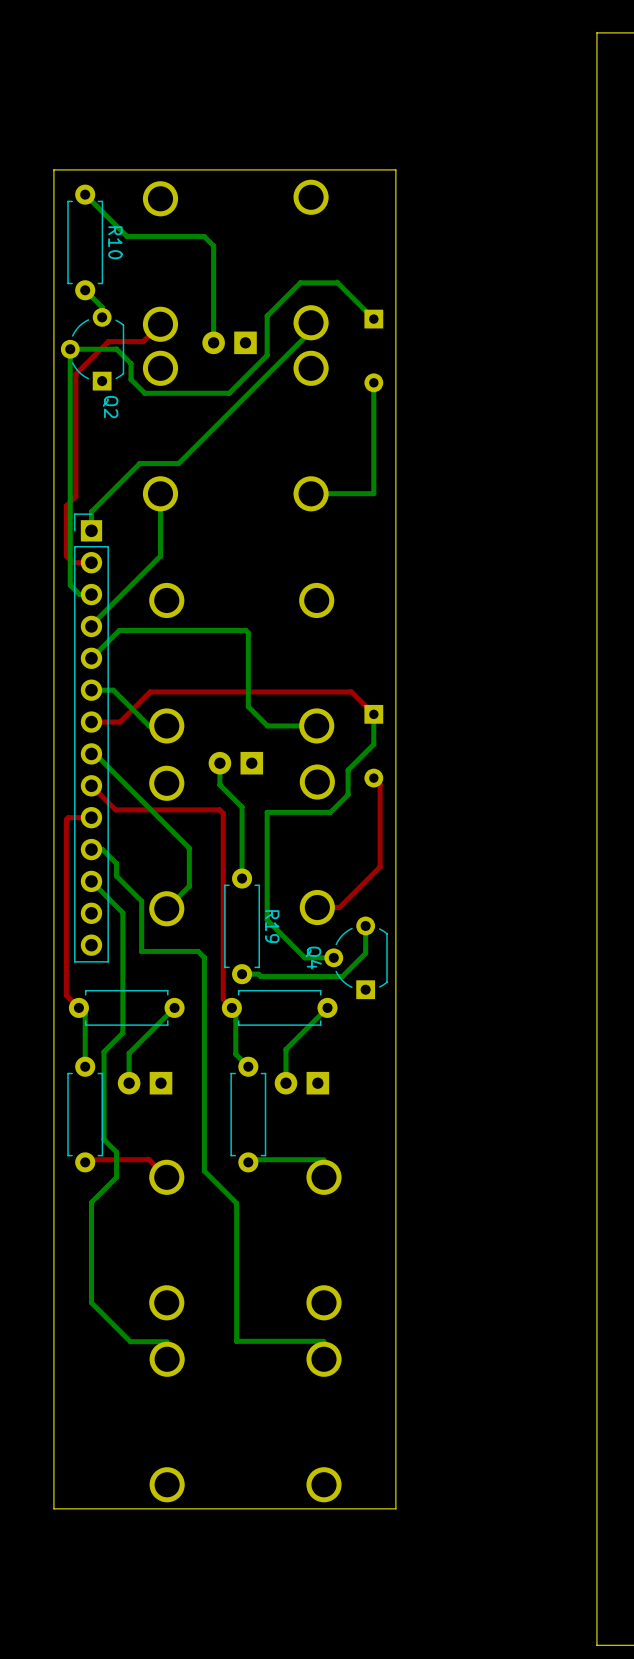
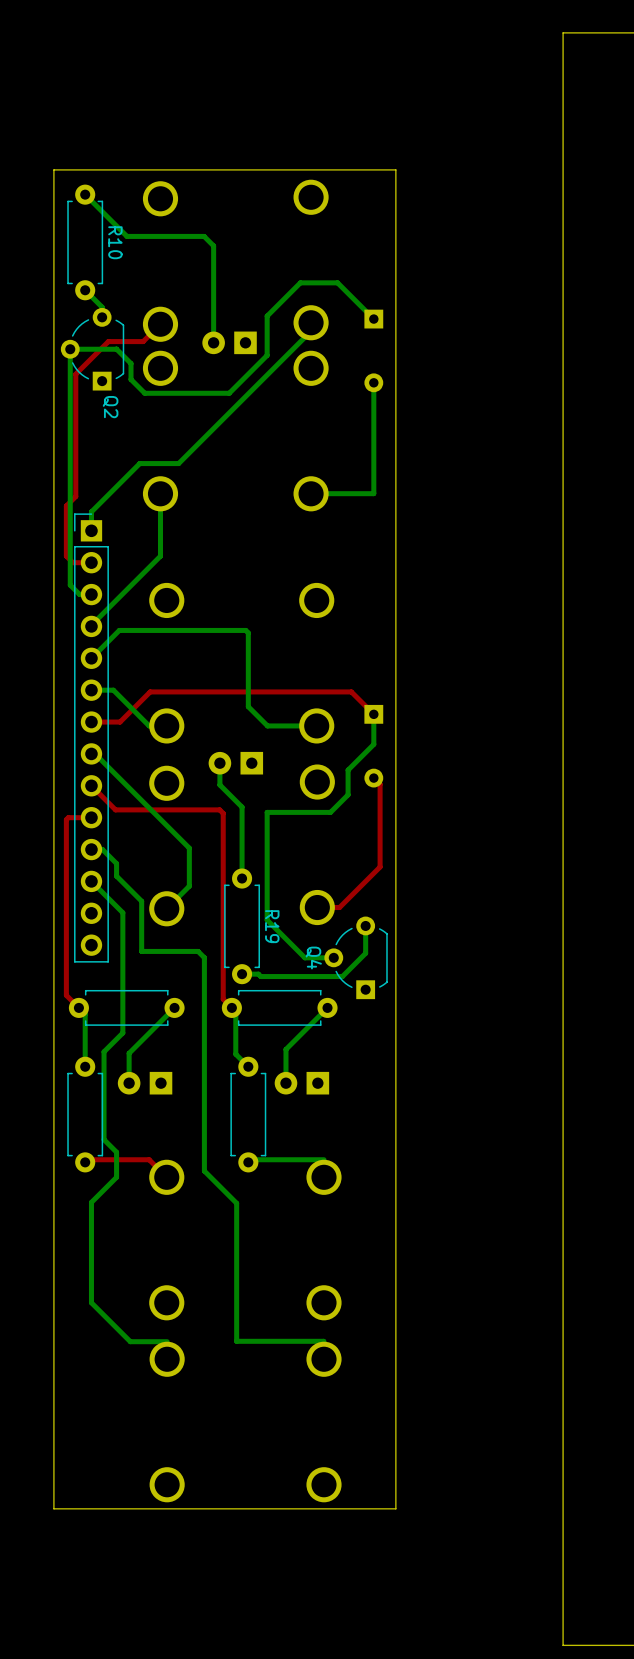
board edge: (596, 32) (596, 1645) -> (596, 32) (563, 32) (563, 1645) (596, 1645)

